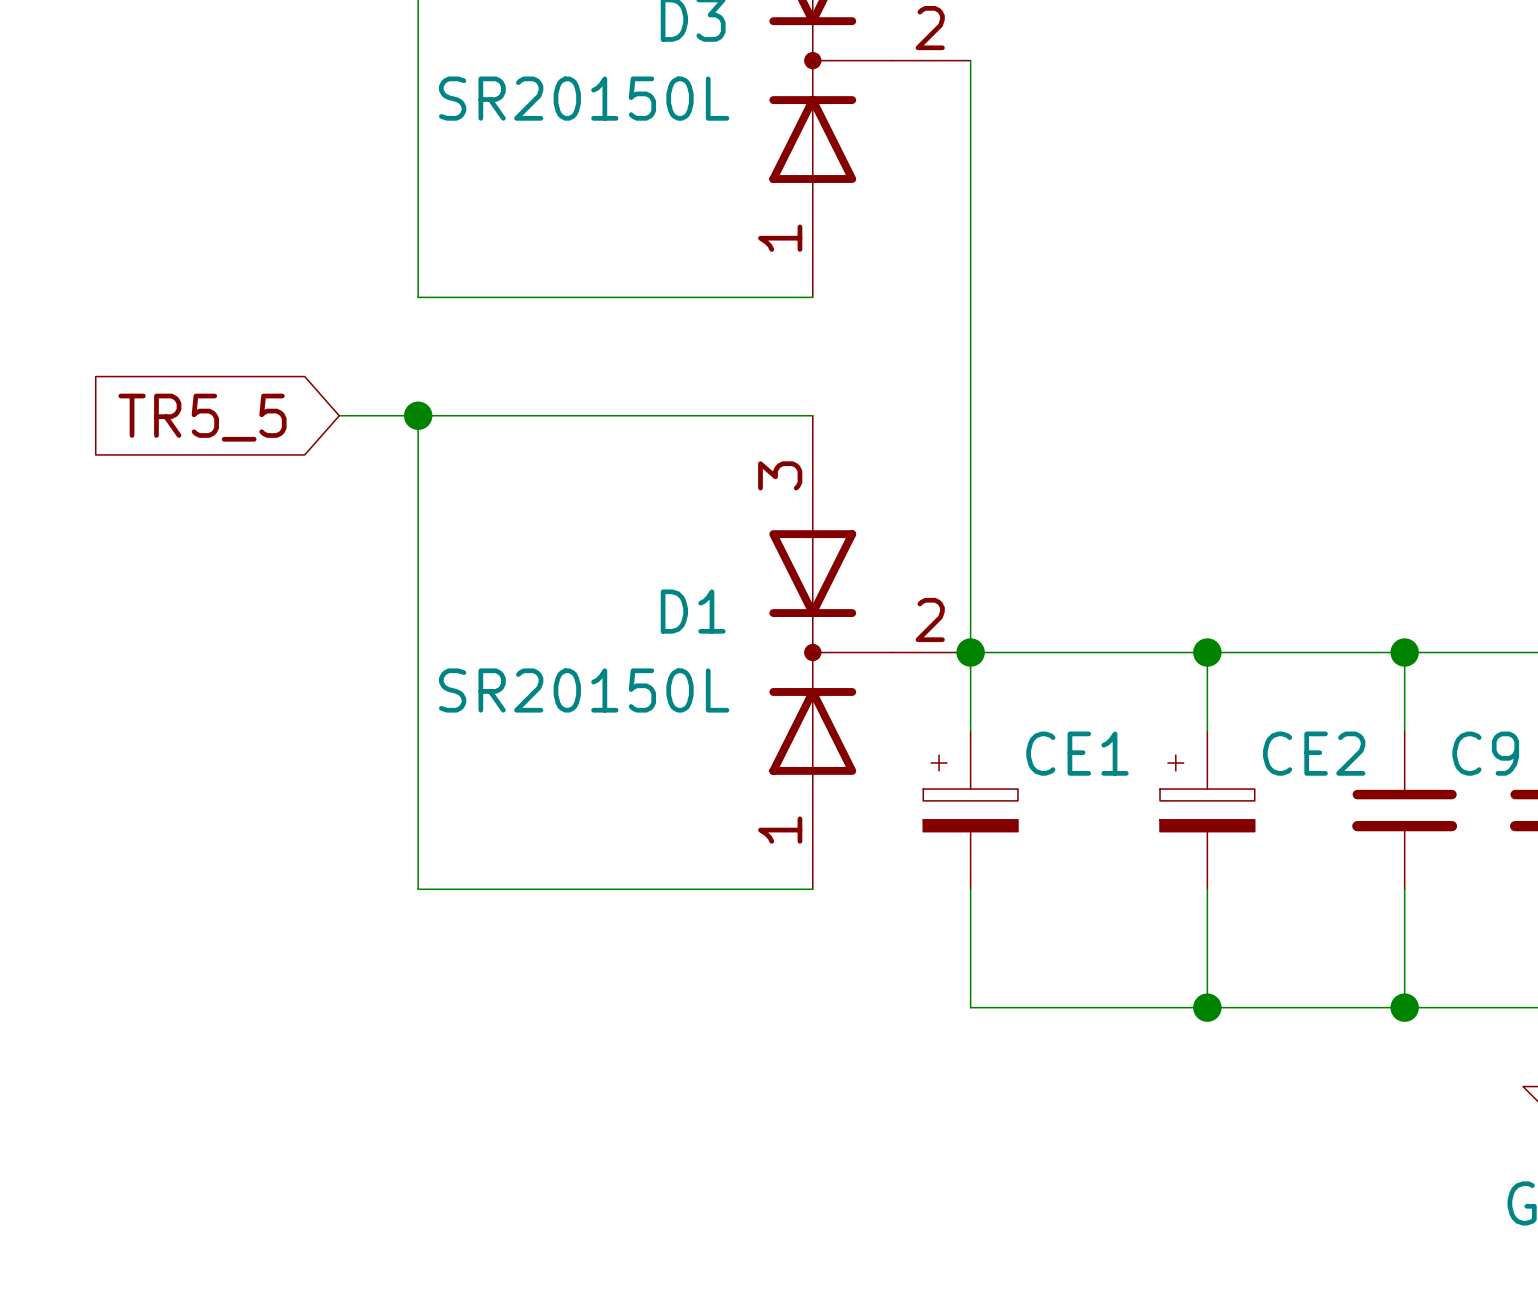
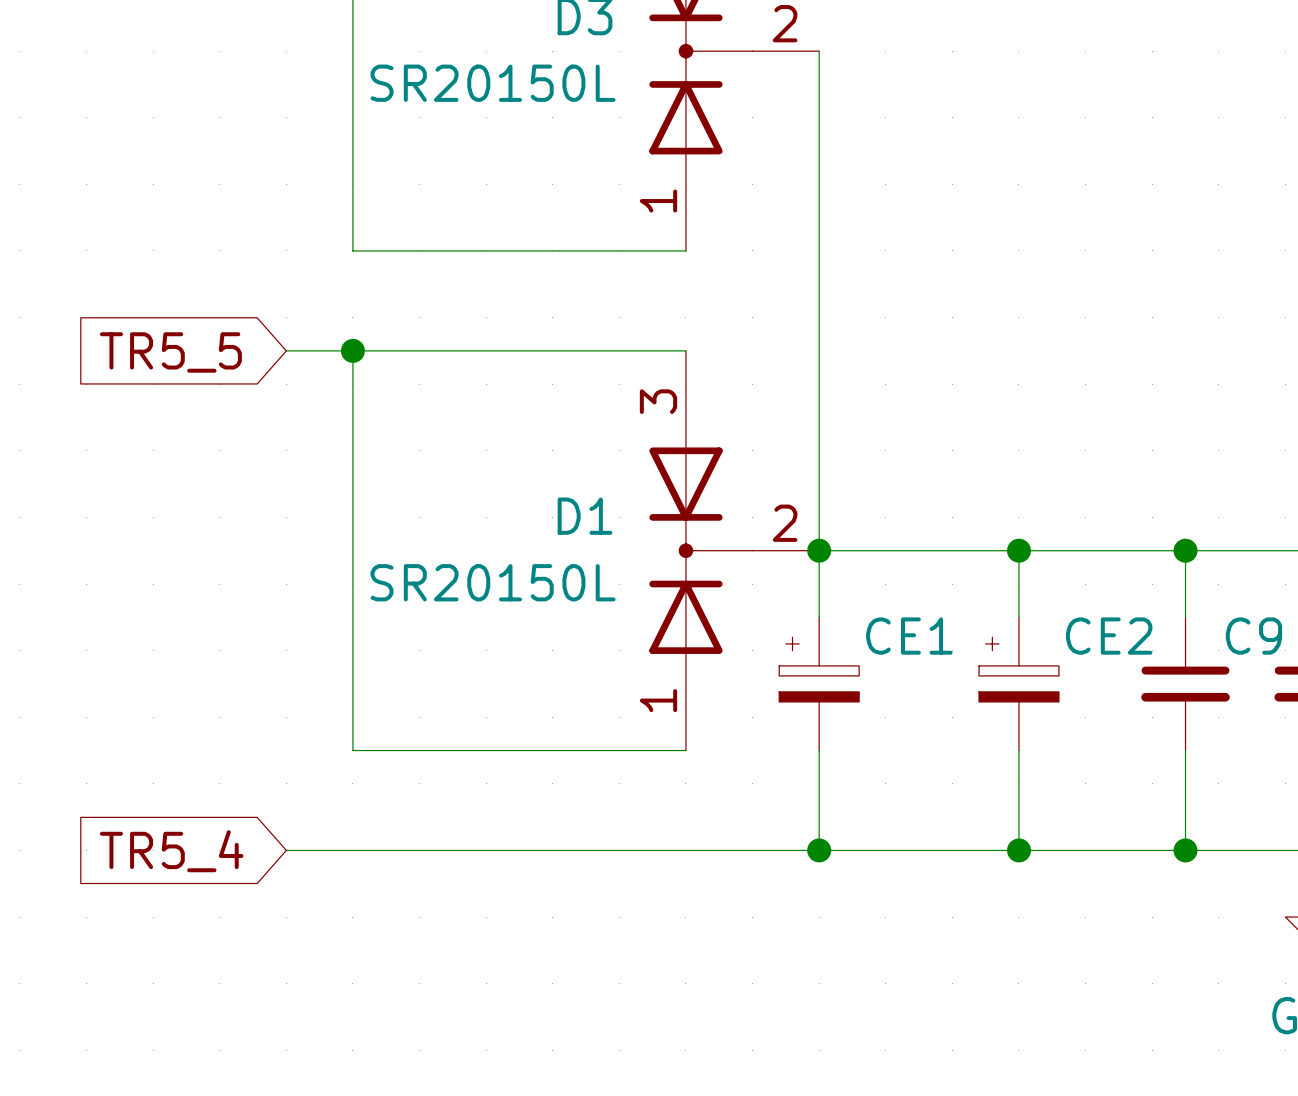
wire: none -> (286, 850) (819, 850)
junction: none -> (819, 850)
global label: none -> TR5_4 (171, 851)

